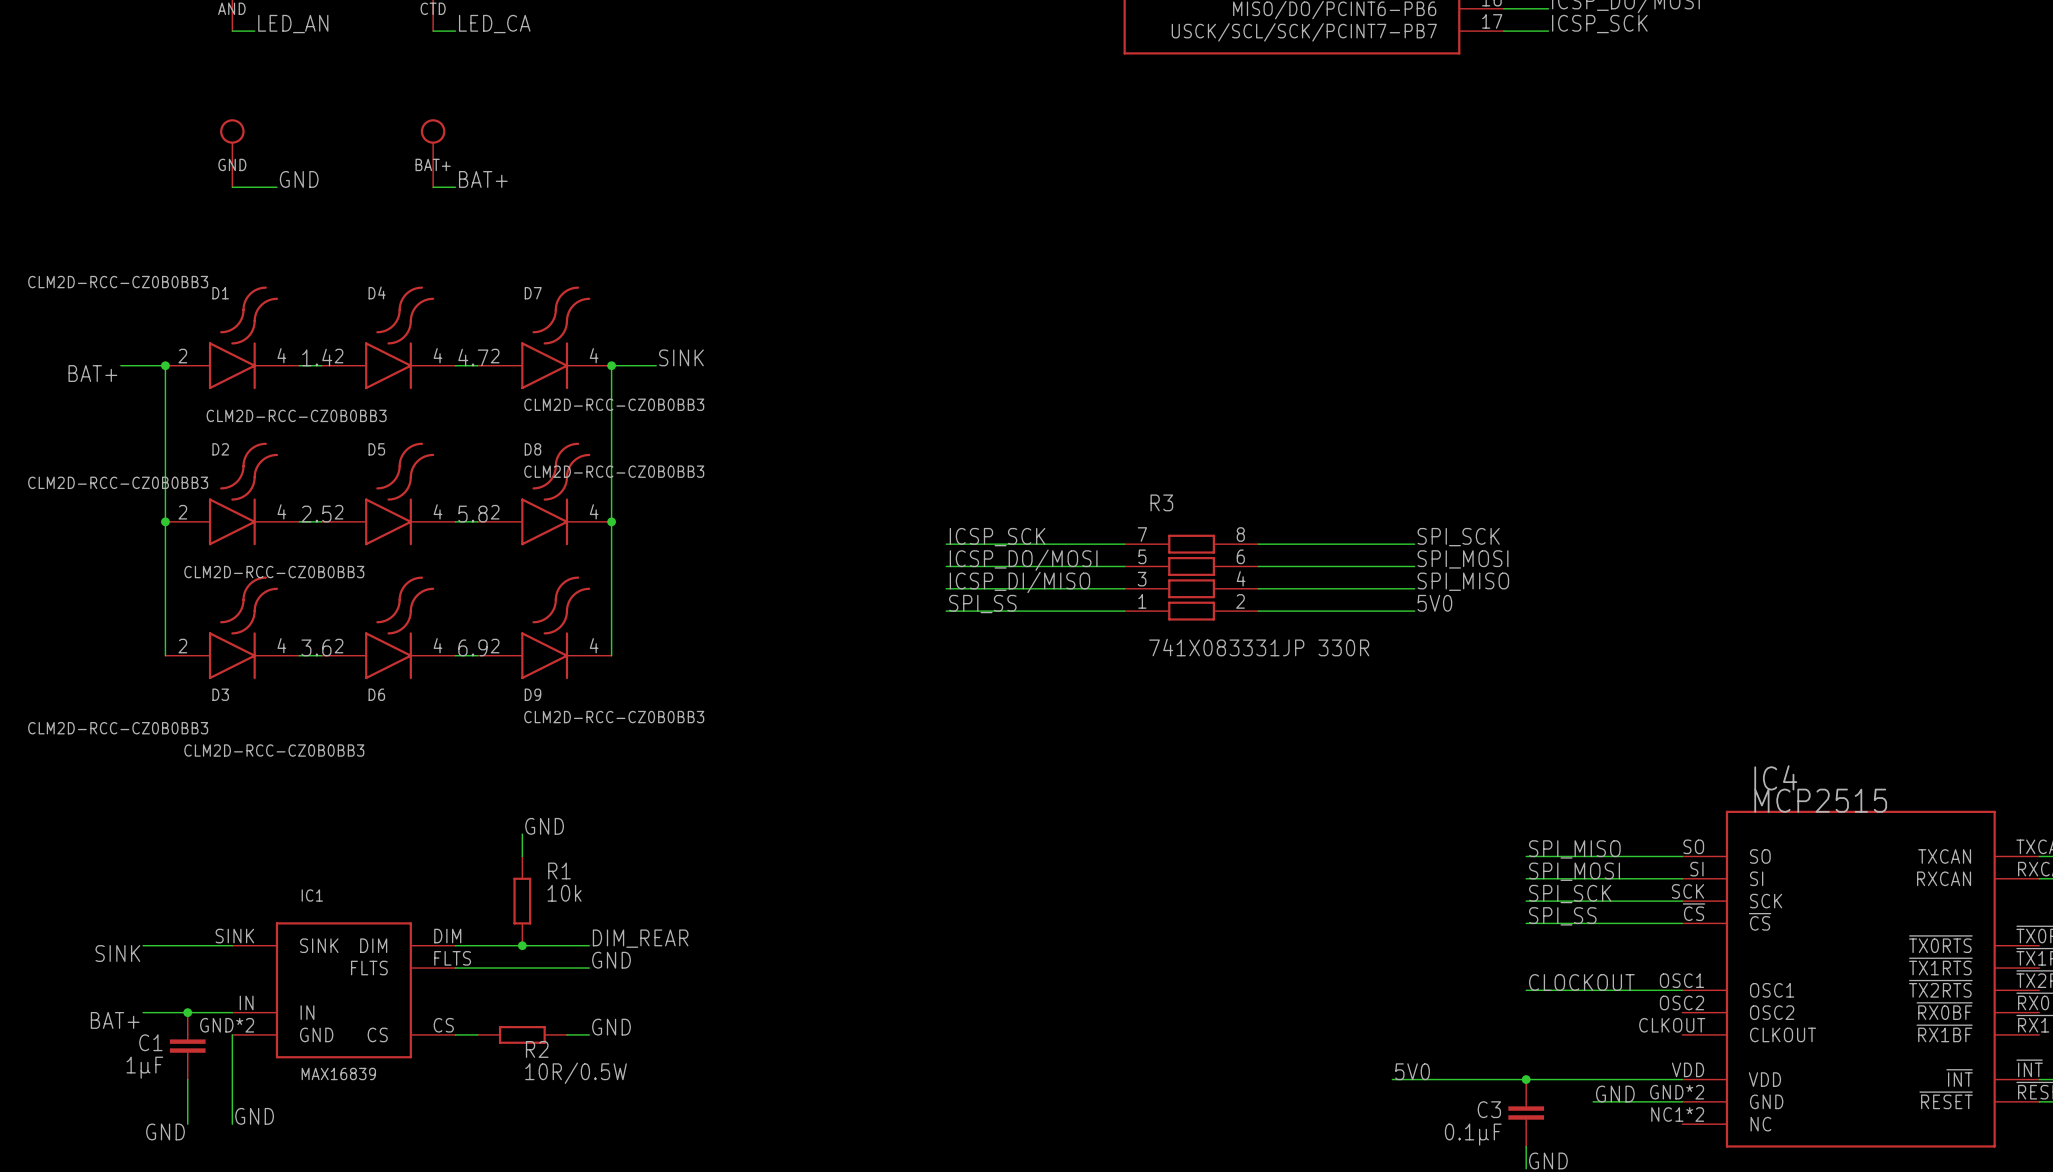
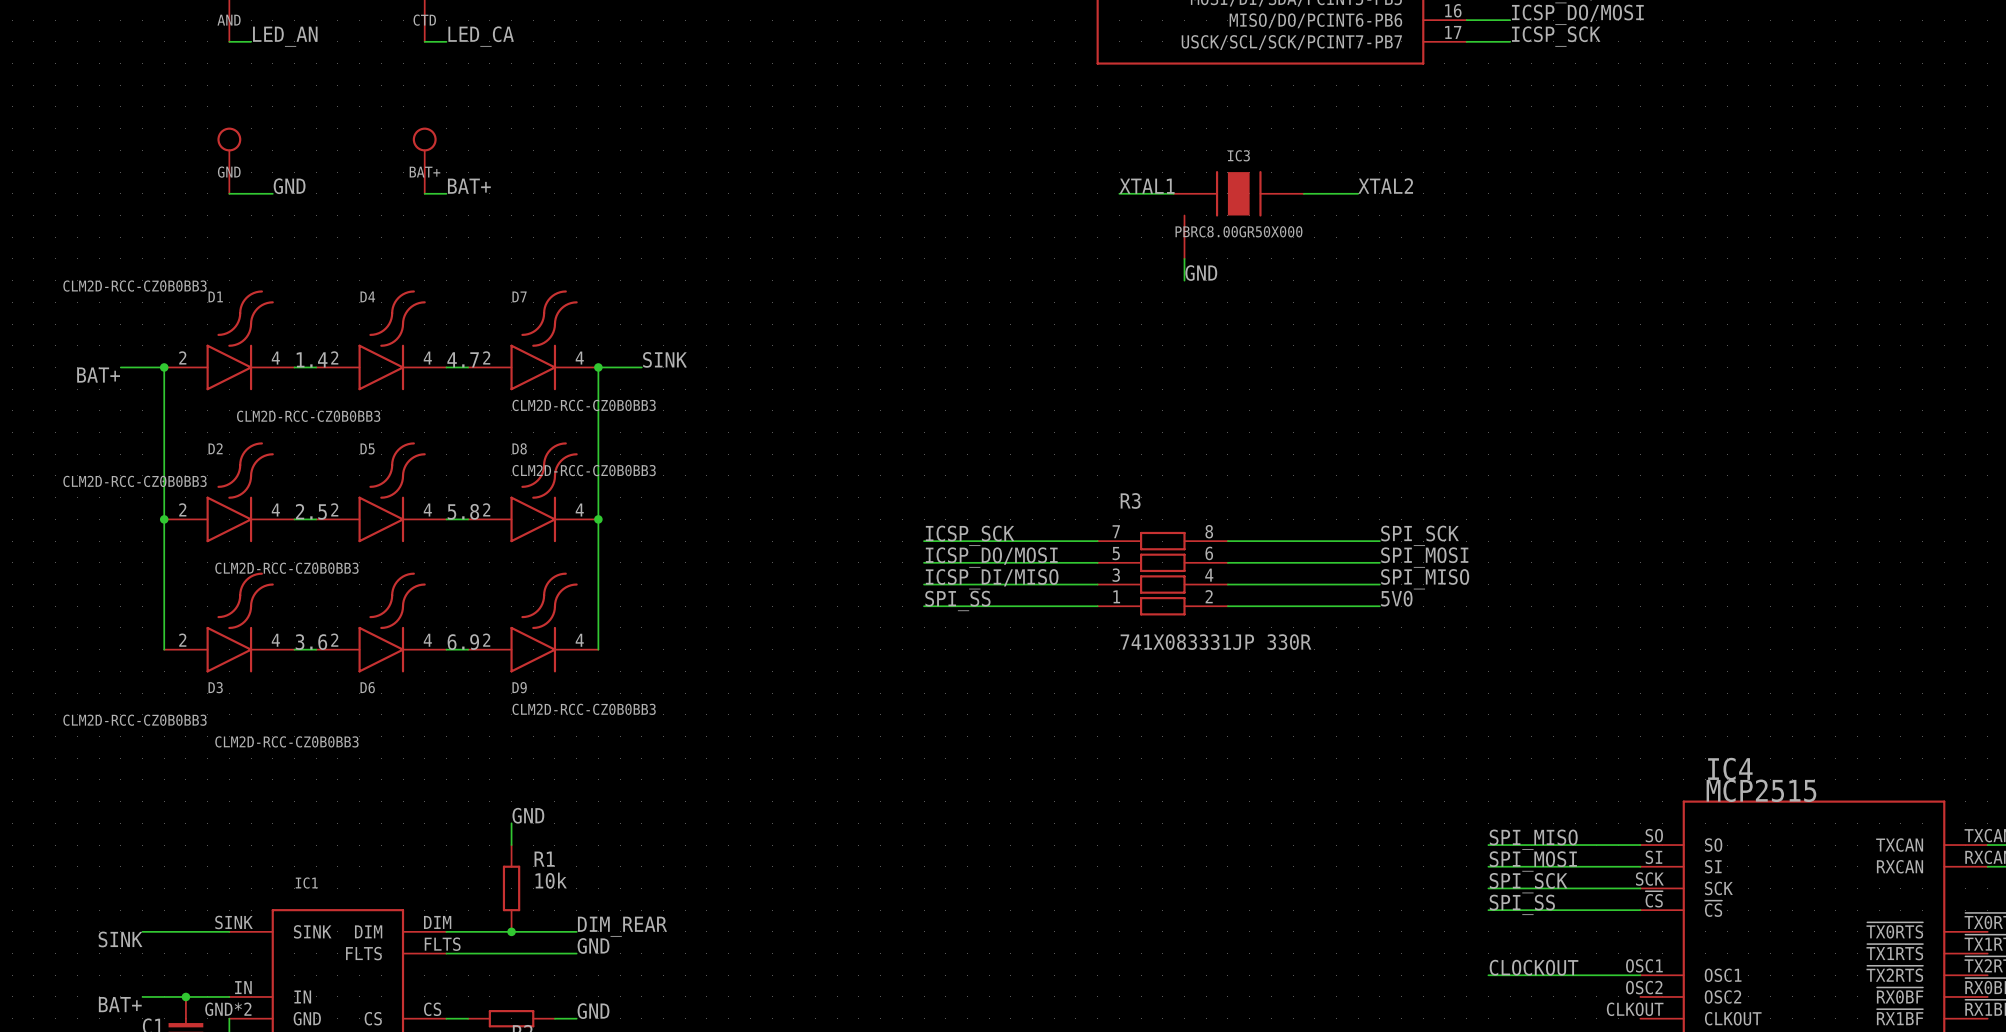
label: none -> XTAL1 (1147, 186)
label: none -> XTAL2 (1385, 186)
wire: none -> (1119, 193) (1173, 193)
wire: none -> (1303, 193) (1358, 193)
IC3: none -> PBRC8.00GR50X000 (1238, 214)
wire: none -> (1184, 258) (1184, 280)
label: none -> GND (1201, 273)

